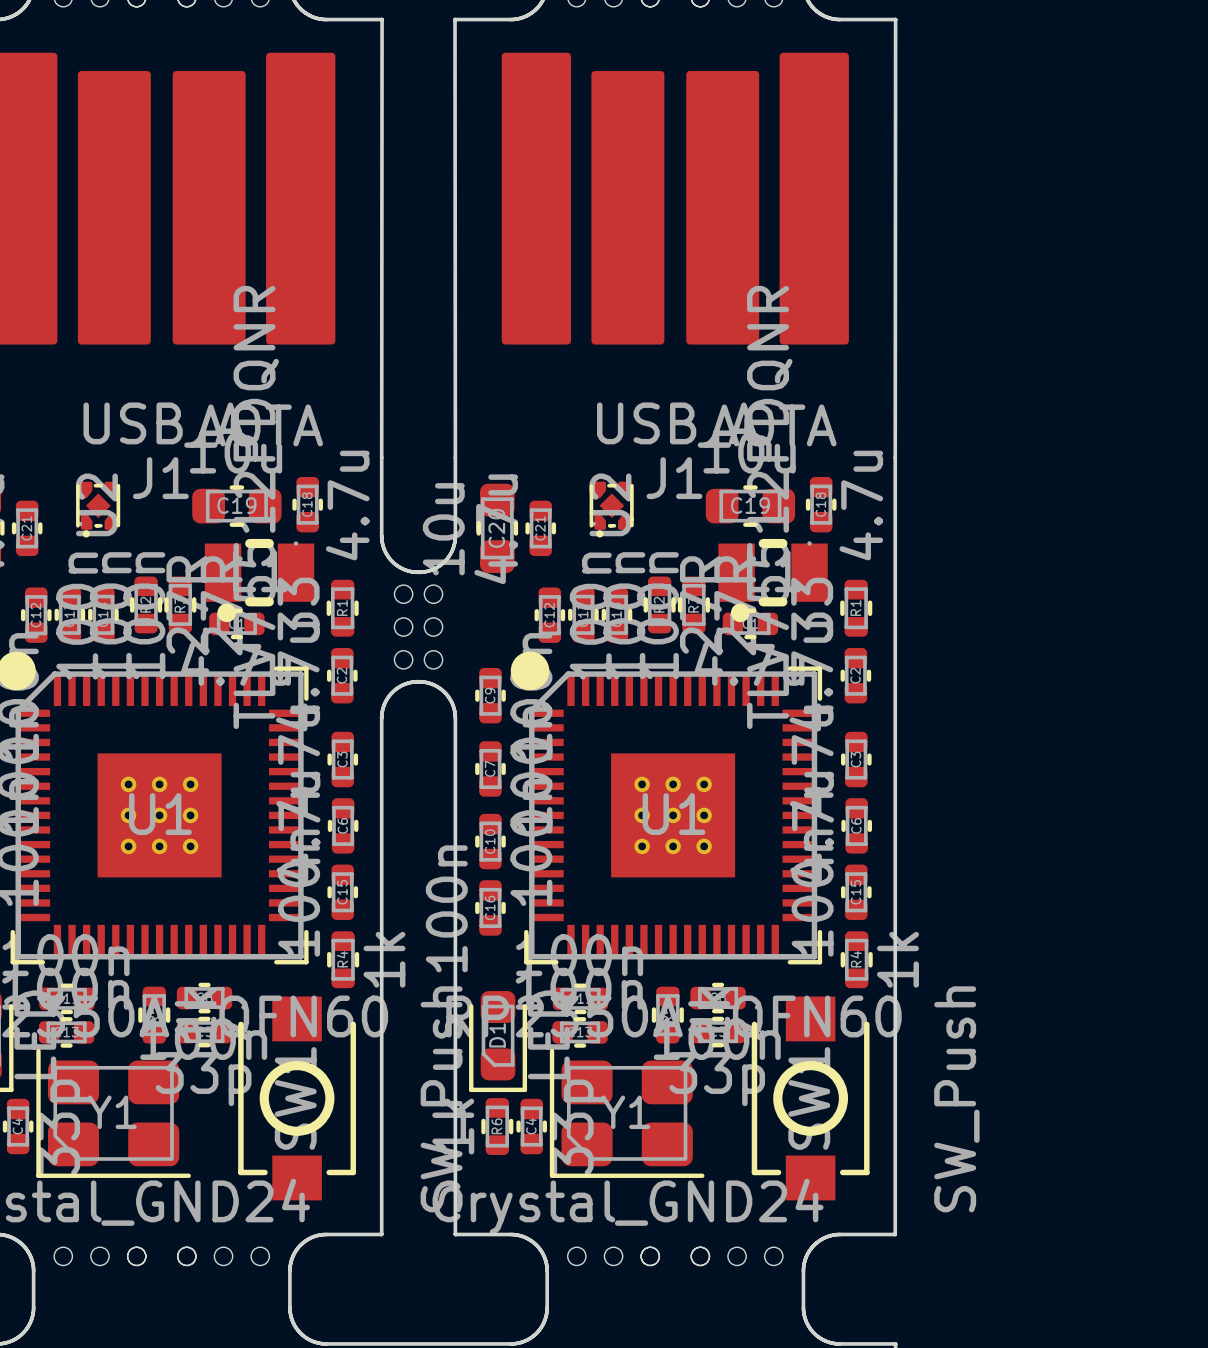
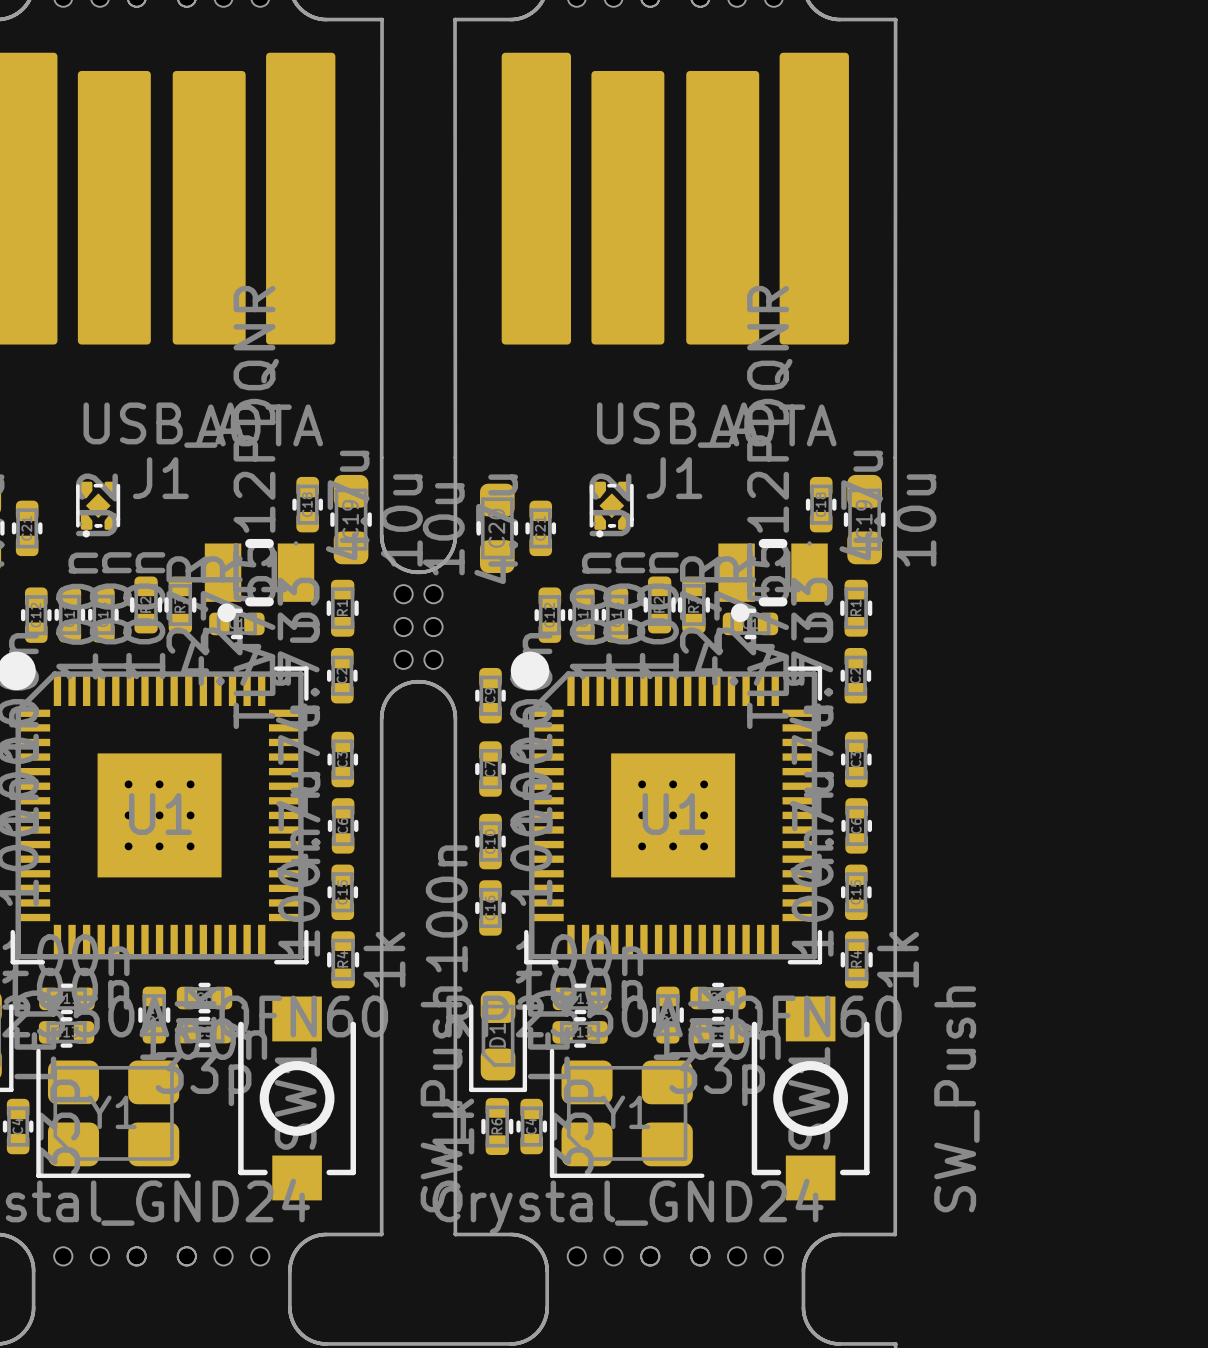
C19 rotation: 0° (236, 506) -> 90° clockwise (351, 519)
C19 position: (236, 506) -> (351, 519)
C19 rotation: 0° (750, 506) -> 90° clockwise (864, 519)
C19 position: (750, 506) -> (864, 519)

